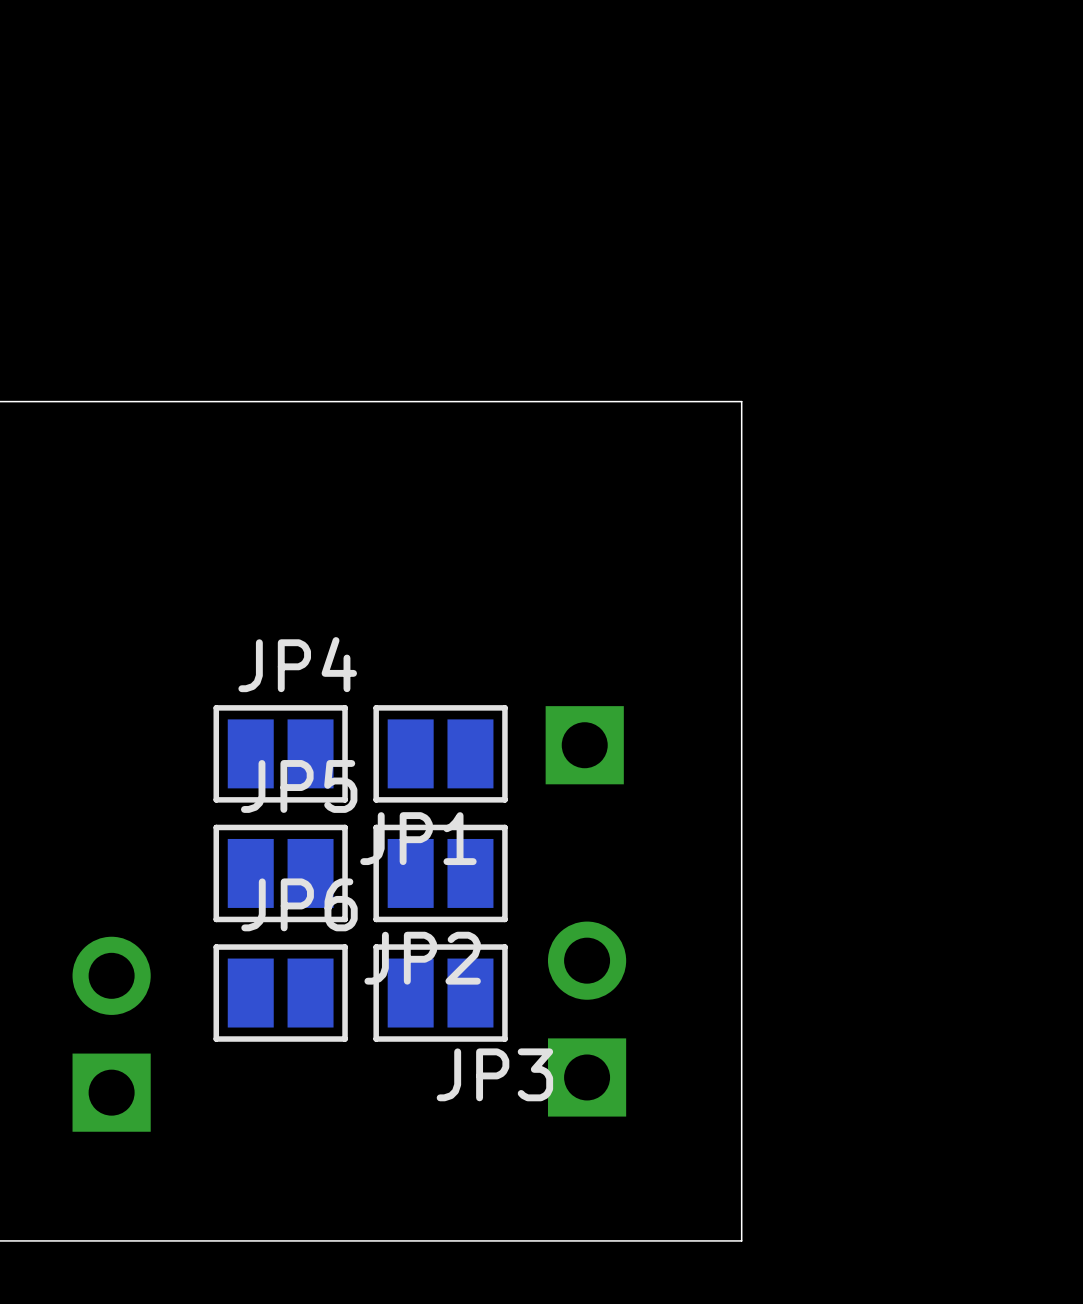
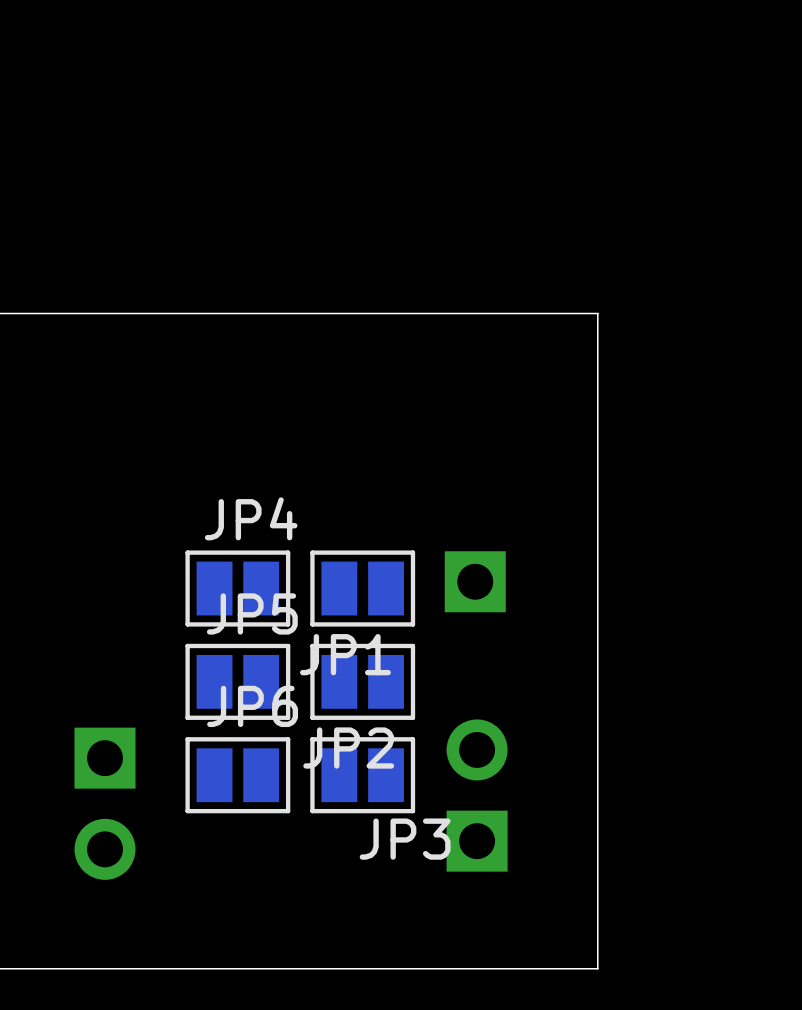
part rotation: 0° (111, 1034) -> 180° (105, 803)

